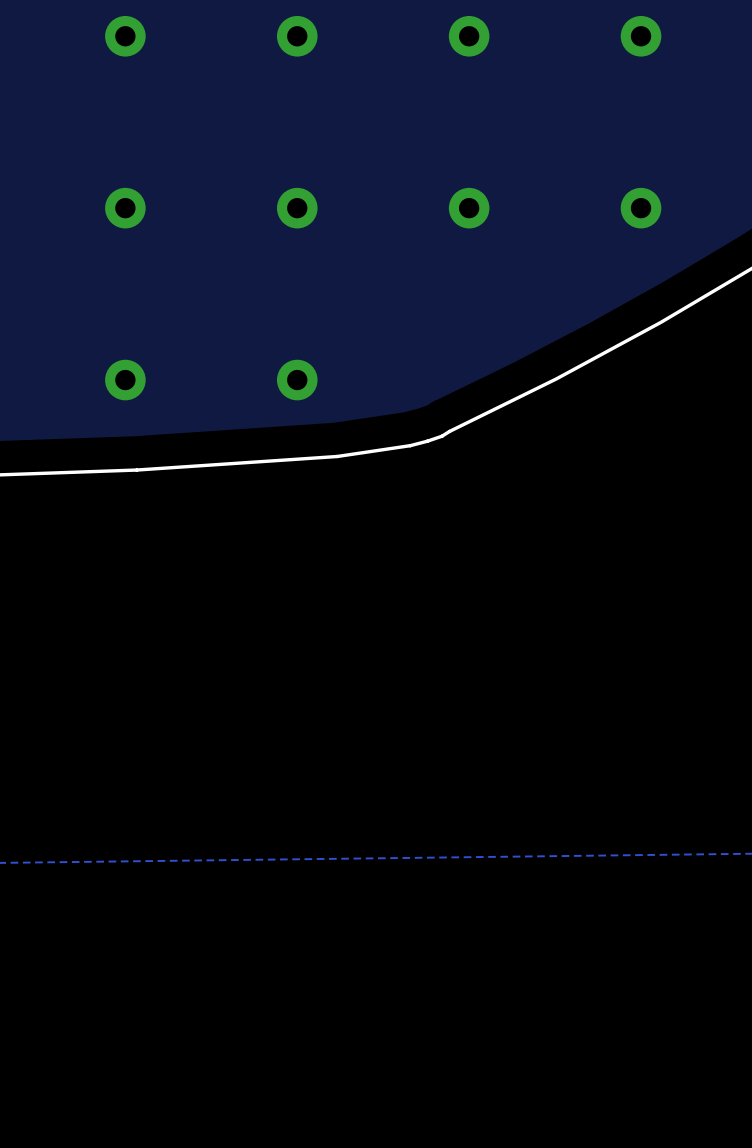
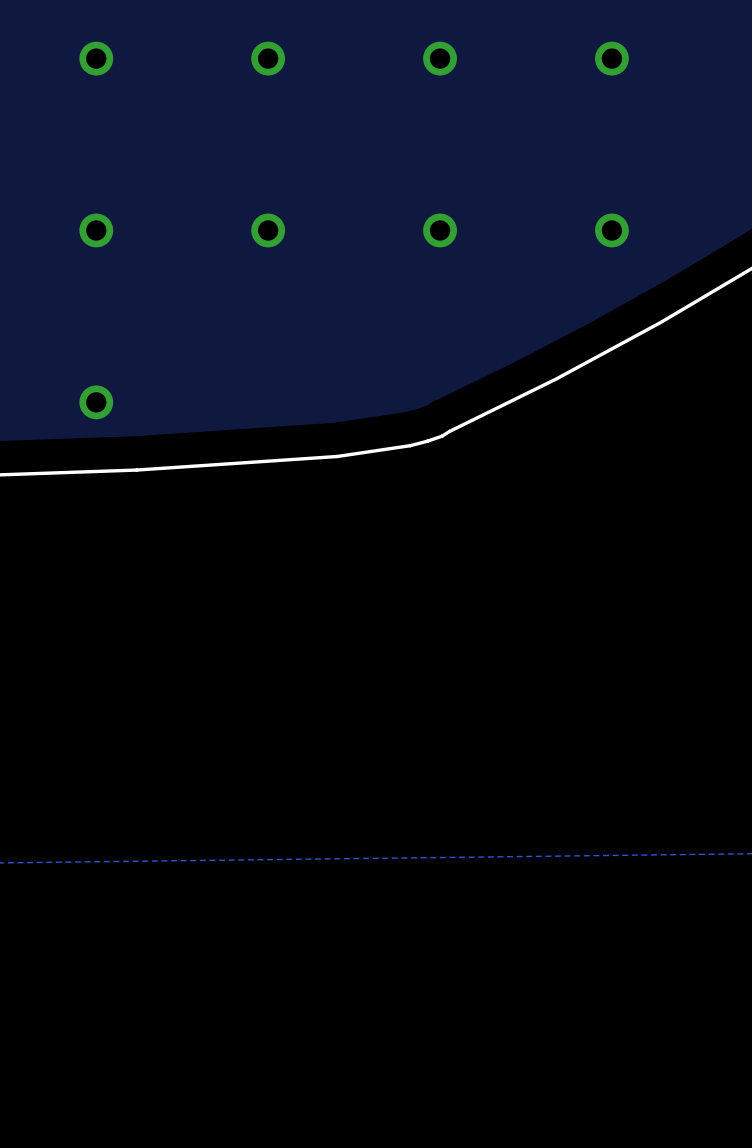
via position: (125, 36) -> (96, 58)
via position: (297, 36) -> (268, 58)
via position: (469, 36) -> (440, 58)
via position: (641, 36) -> (611, 58)
via position: (125, 208) -> (96, 230)
via position: (297, 208) -> (268, 230)
via position: (469, 208) -> (440, 230)
via position: (641, 208) -> (611, 230)
via position: (125, 380) -> (96, 402)
via: (297, 380) -> none

